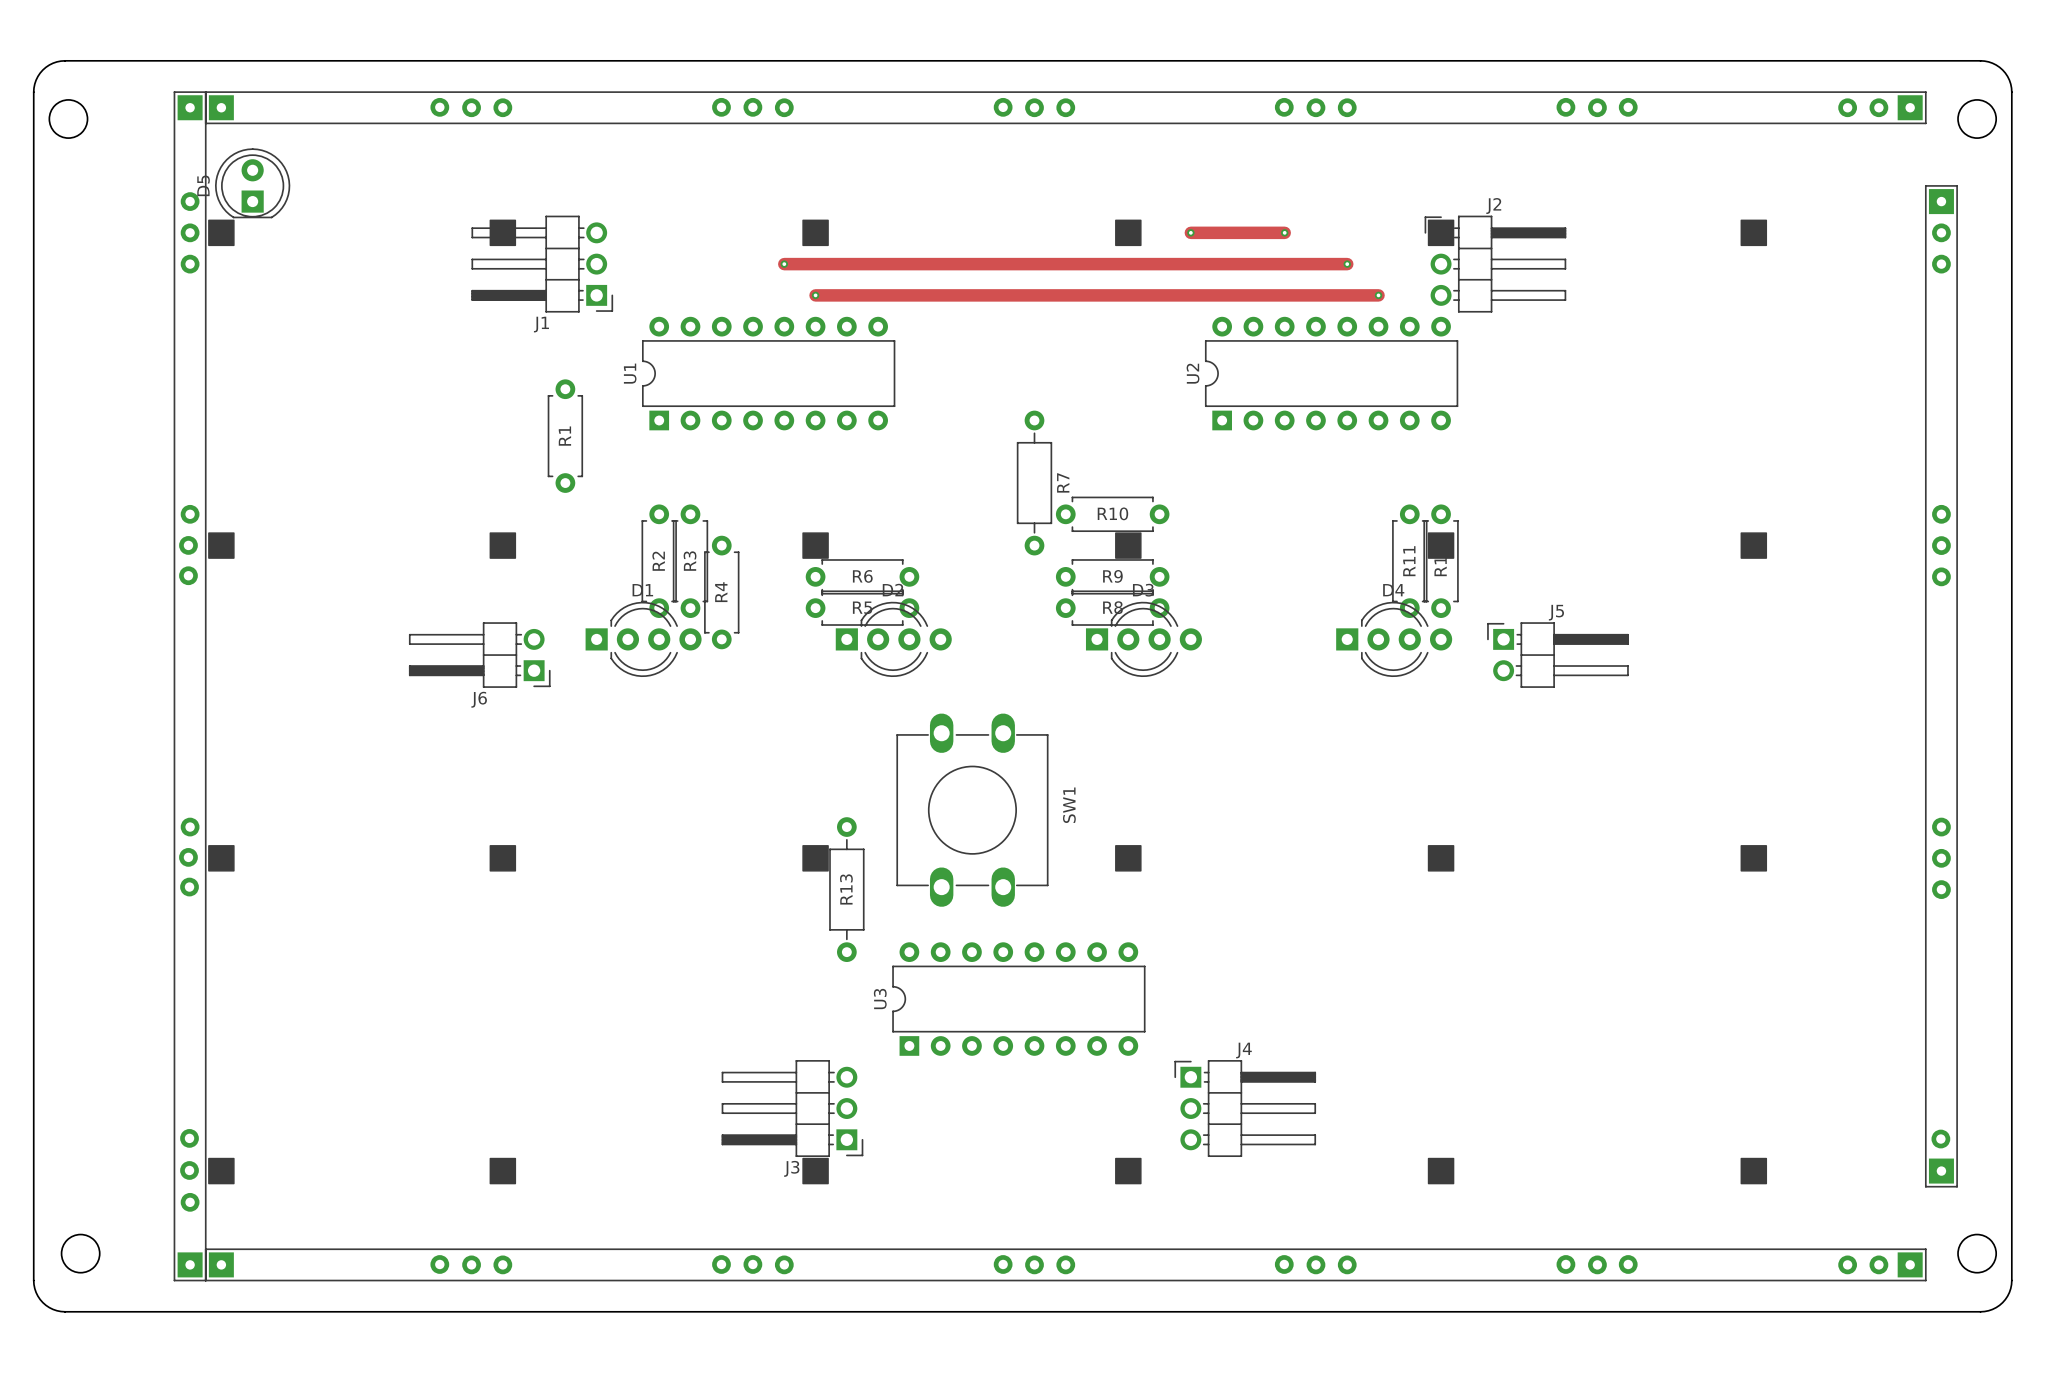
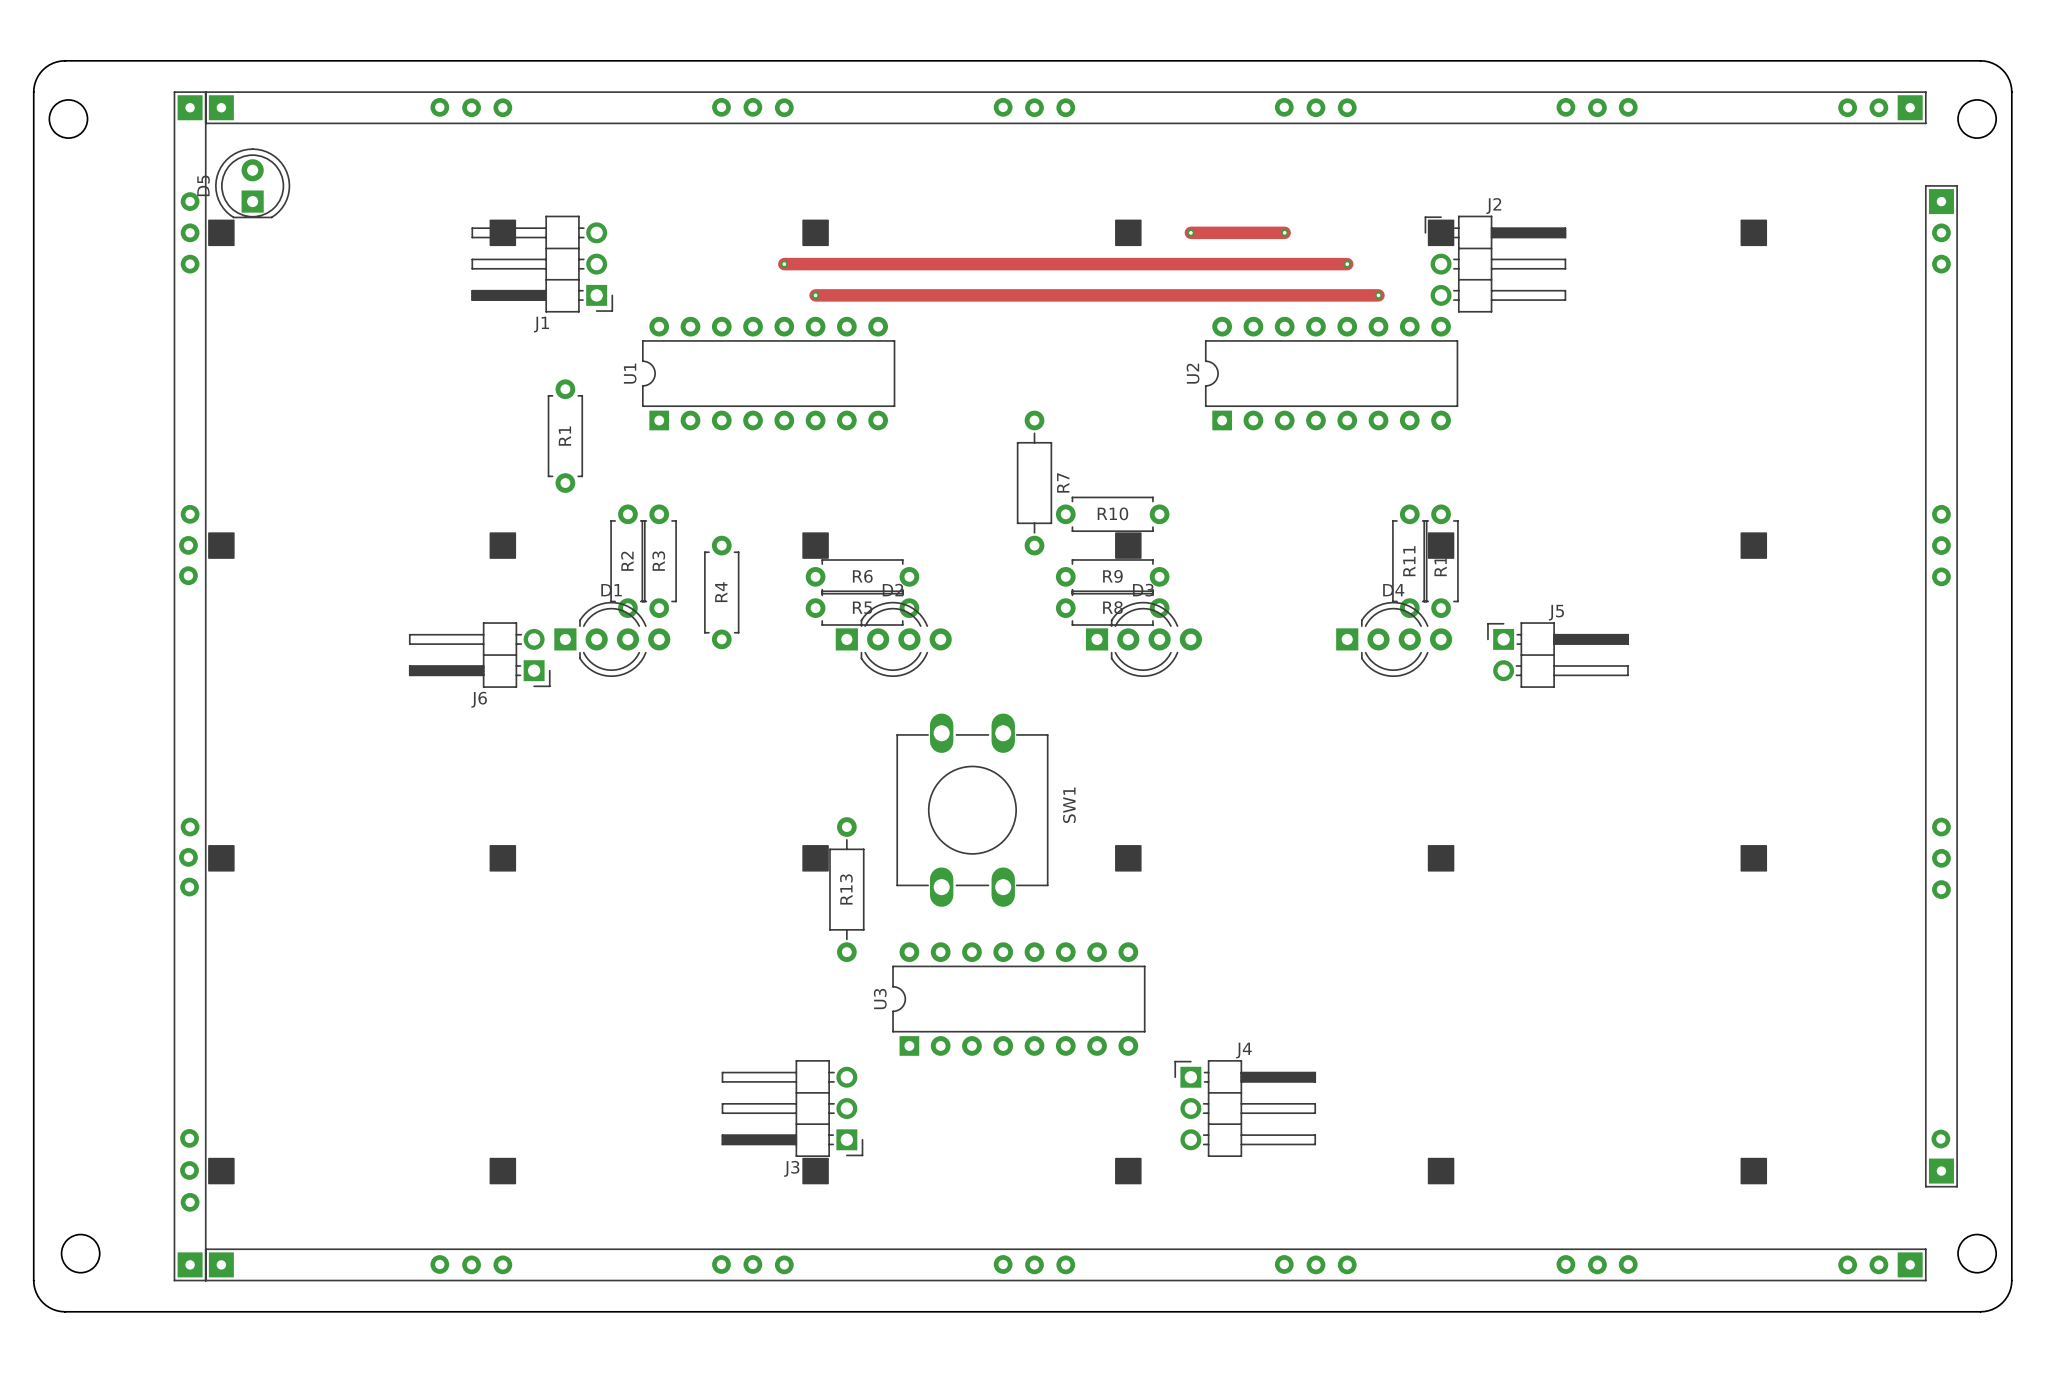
R2: none -> (627, 561)
R2 name: R2 (658, 561) -> R3 (658, 561)
R3: (690, 561) -> none
D1 position: (643, 639) -> (612, 639)

